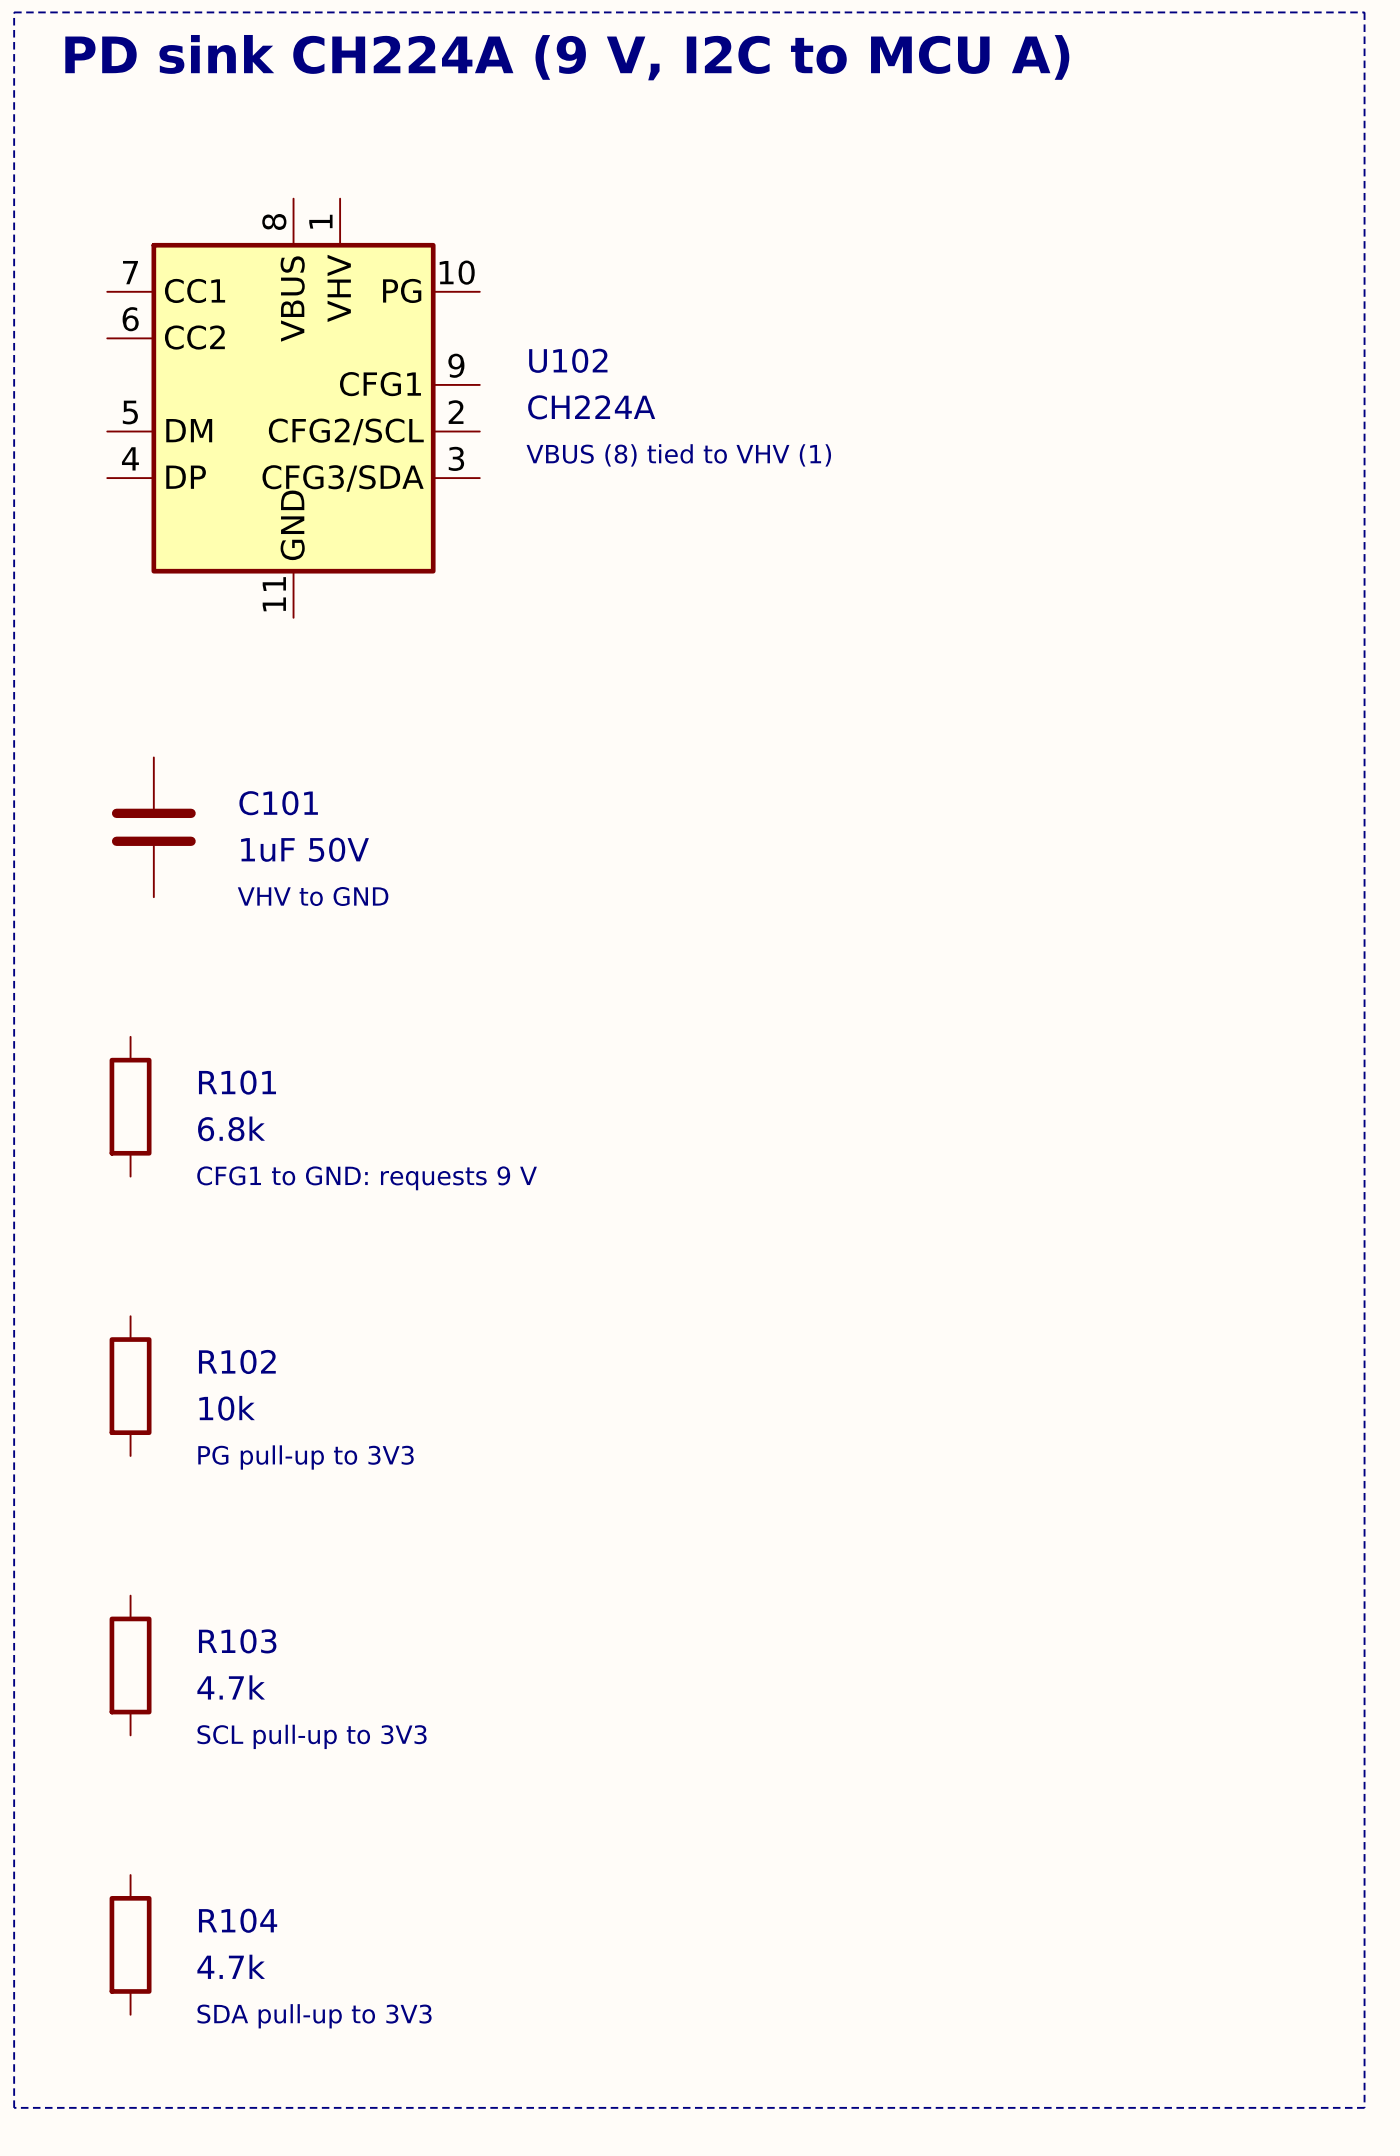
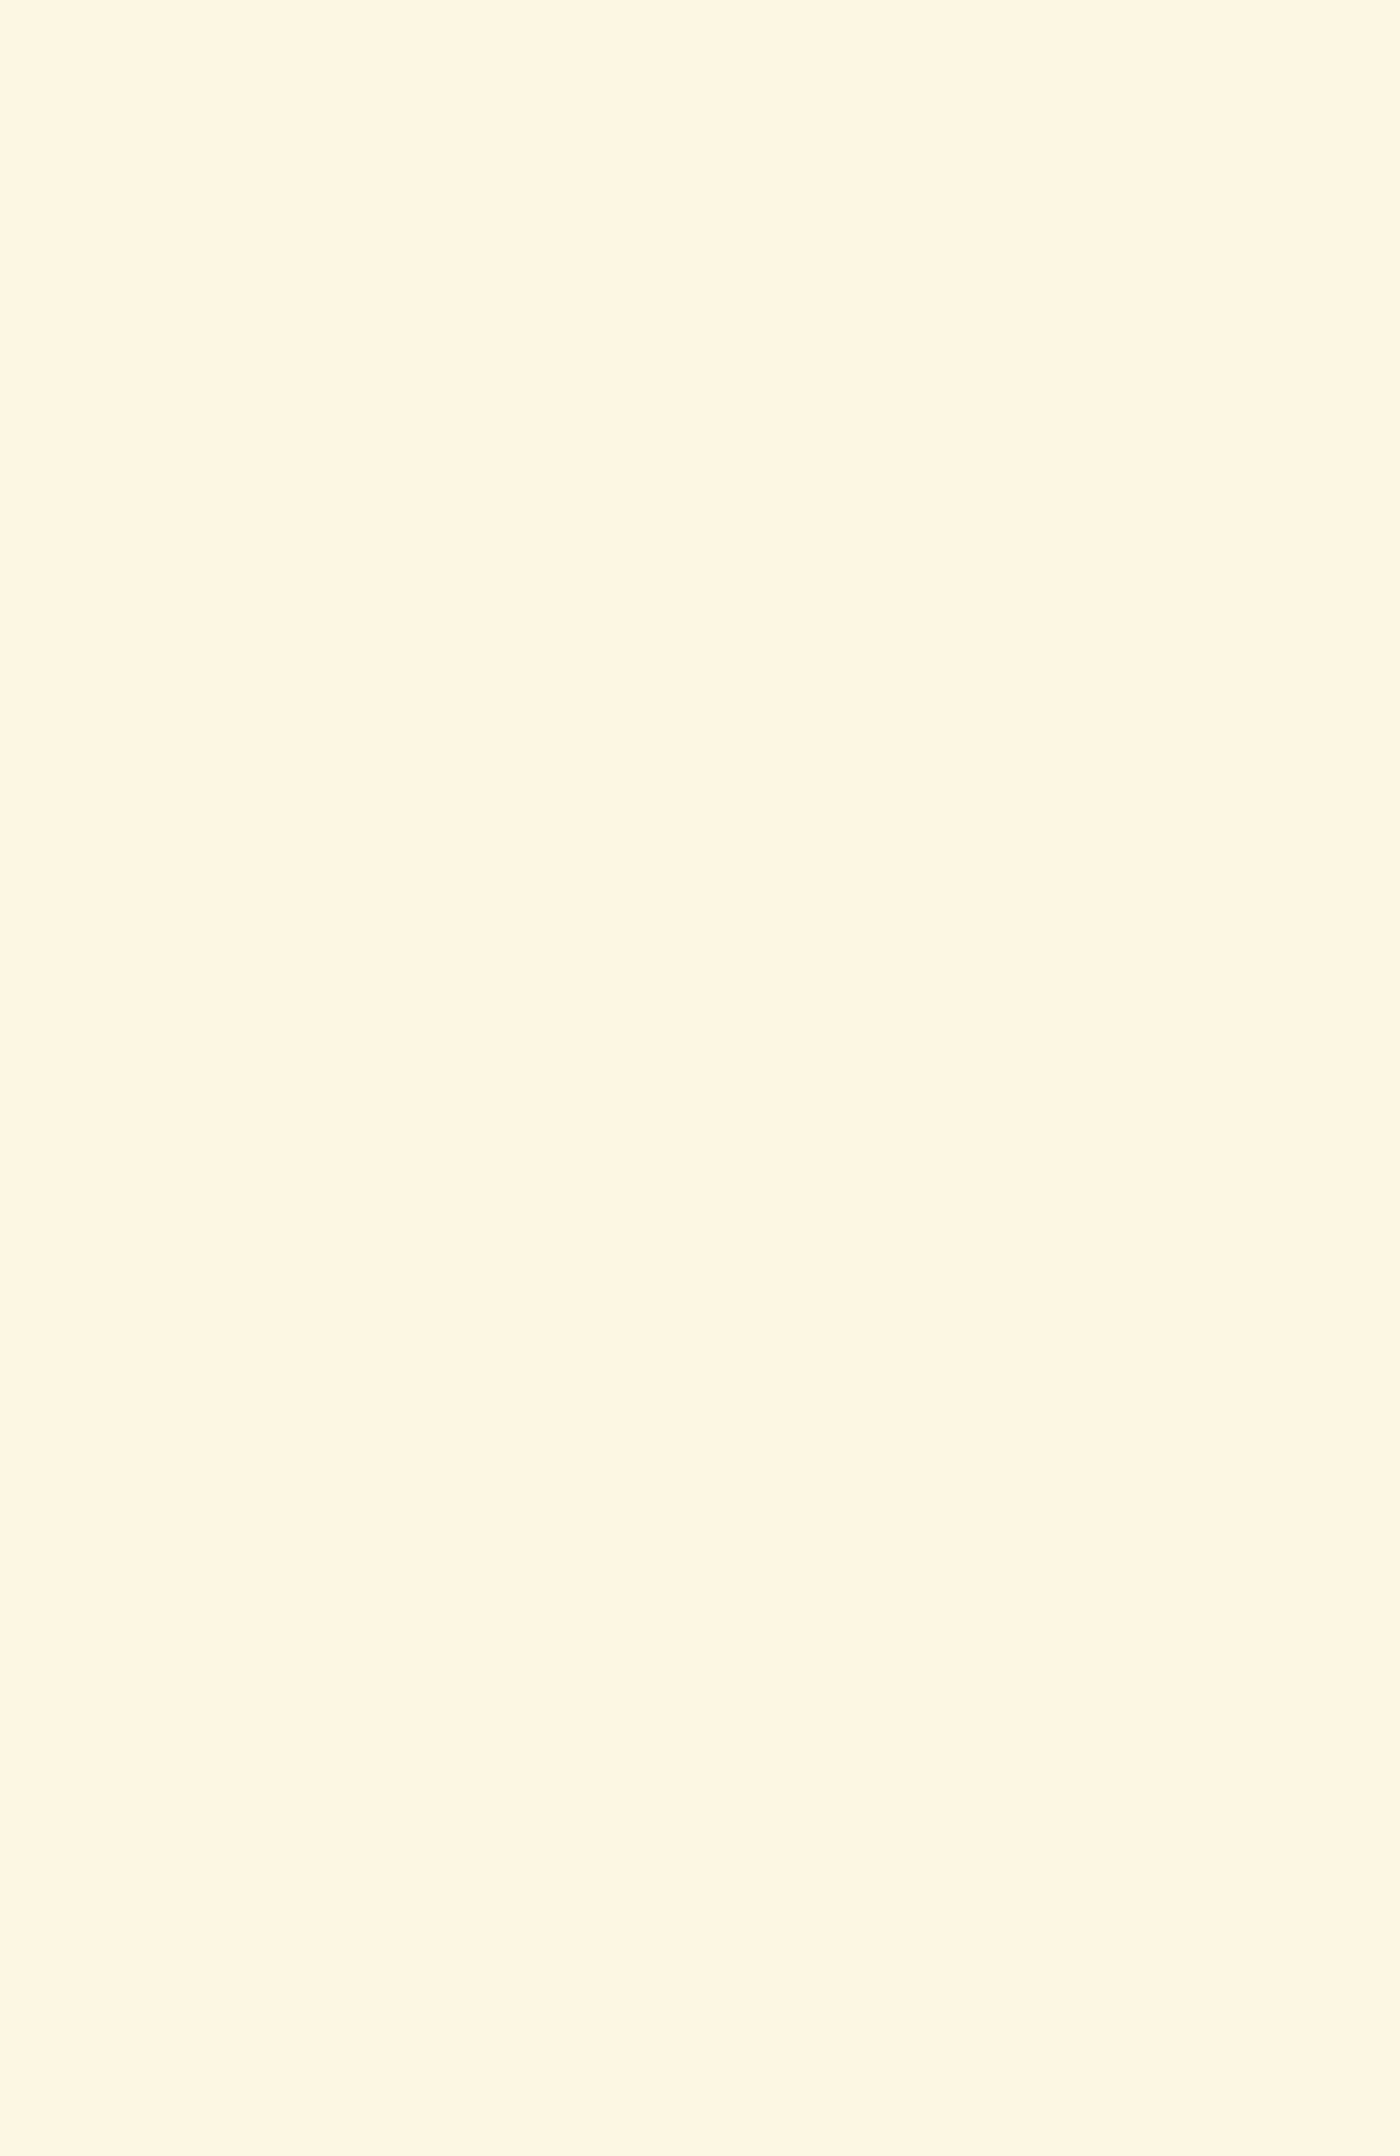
line: (14, 12) (1364, 12) (1364, 2107) (14, 2107) (14, 12) -> none
text: PD sink CH224A (9 V, I2C to MCU A) (567, 57) -> none
U102: CH224A (293, 408) -> none
C101: 1uF 50V (153, 827) -> none
R101: 6.8k (130, 1106) -> none
R102: 10k (130, 1386) -> none
R103: 4.7k (130, 1665) -> none
R104: 4.7k (130, 1944) -> none

